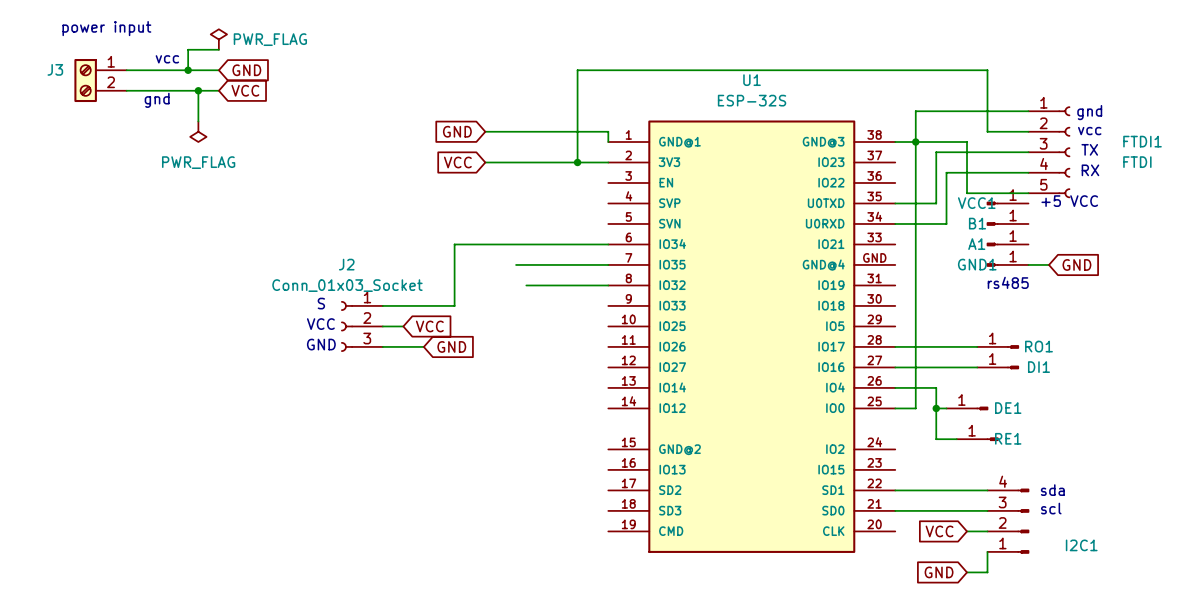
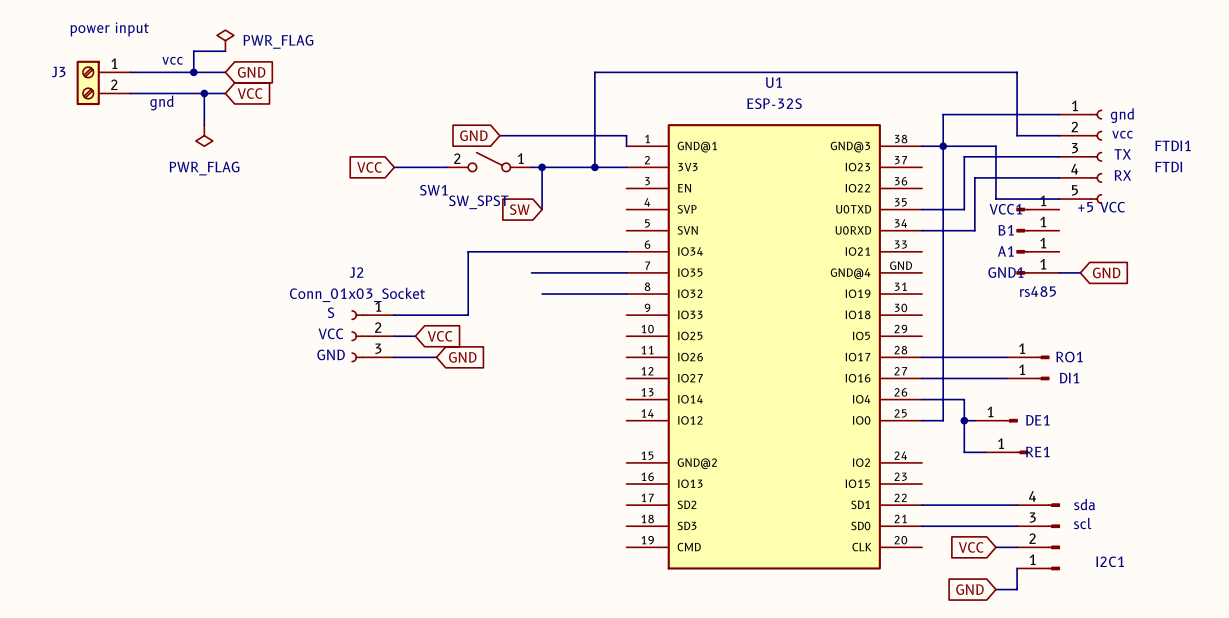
SW1: none -> SW_SPST (489, 162)
wire: none -> (394, 167) (447, 167)
global label position: VCC (457, 162) -> VCC (369, 167)
wire: none -> (542, 167) (542, 209)
junction: none -> (542, 167)
global label: none -> SW (519, 209)

